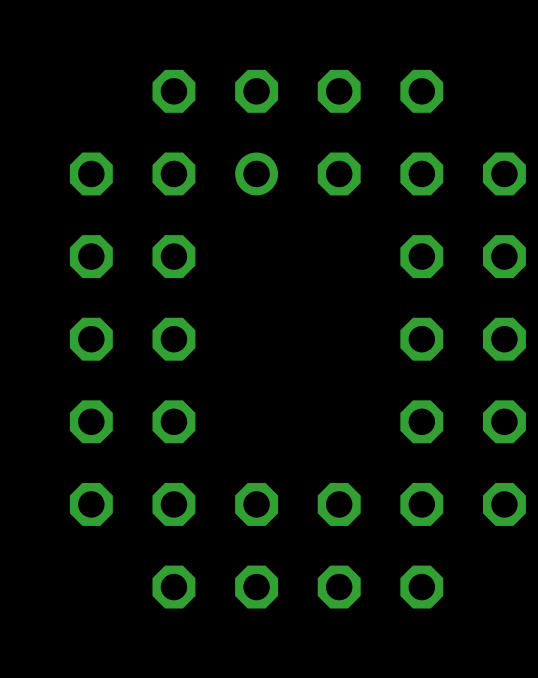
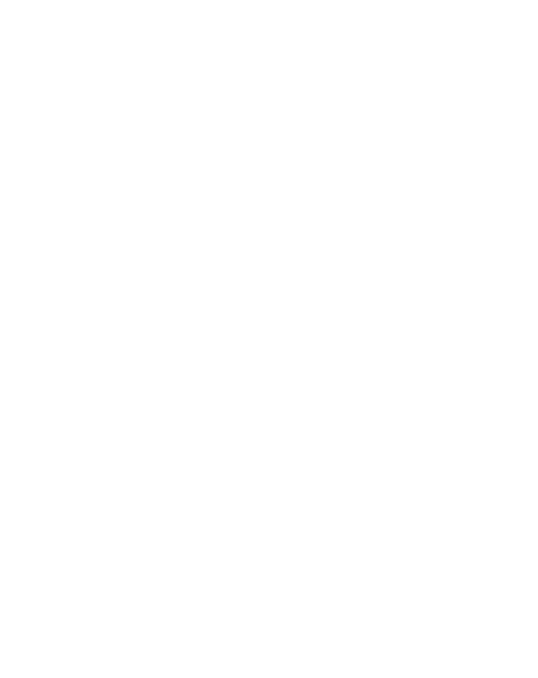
part: (297, 339) -> none

